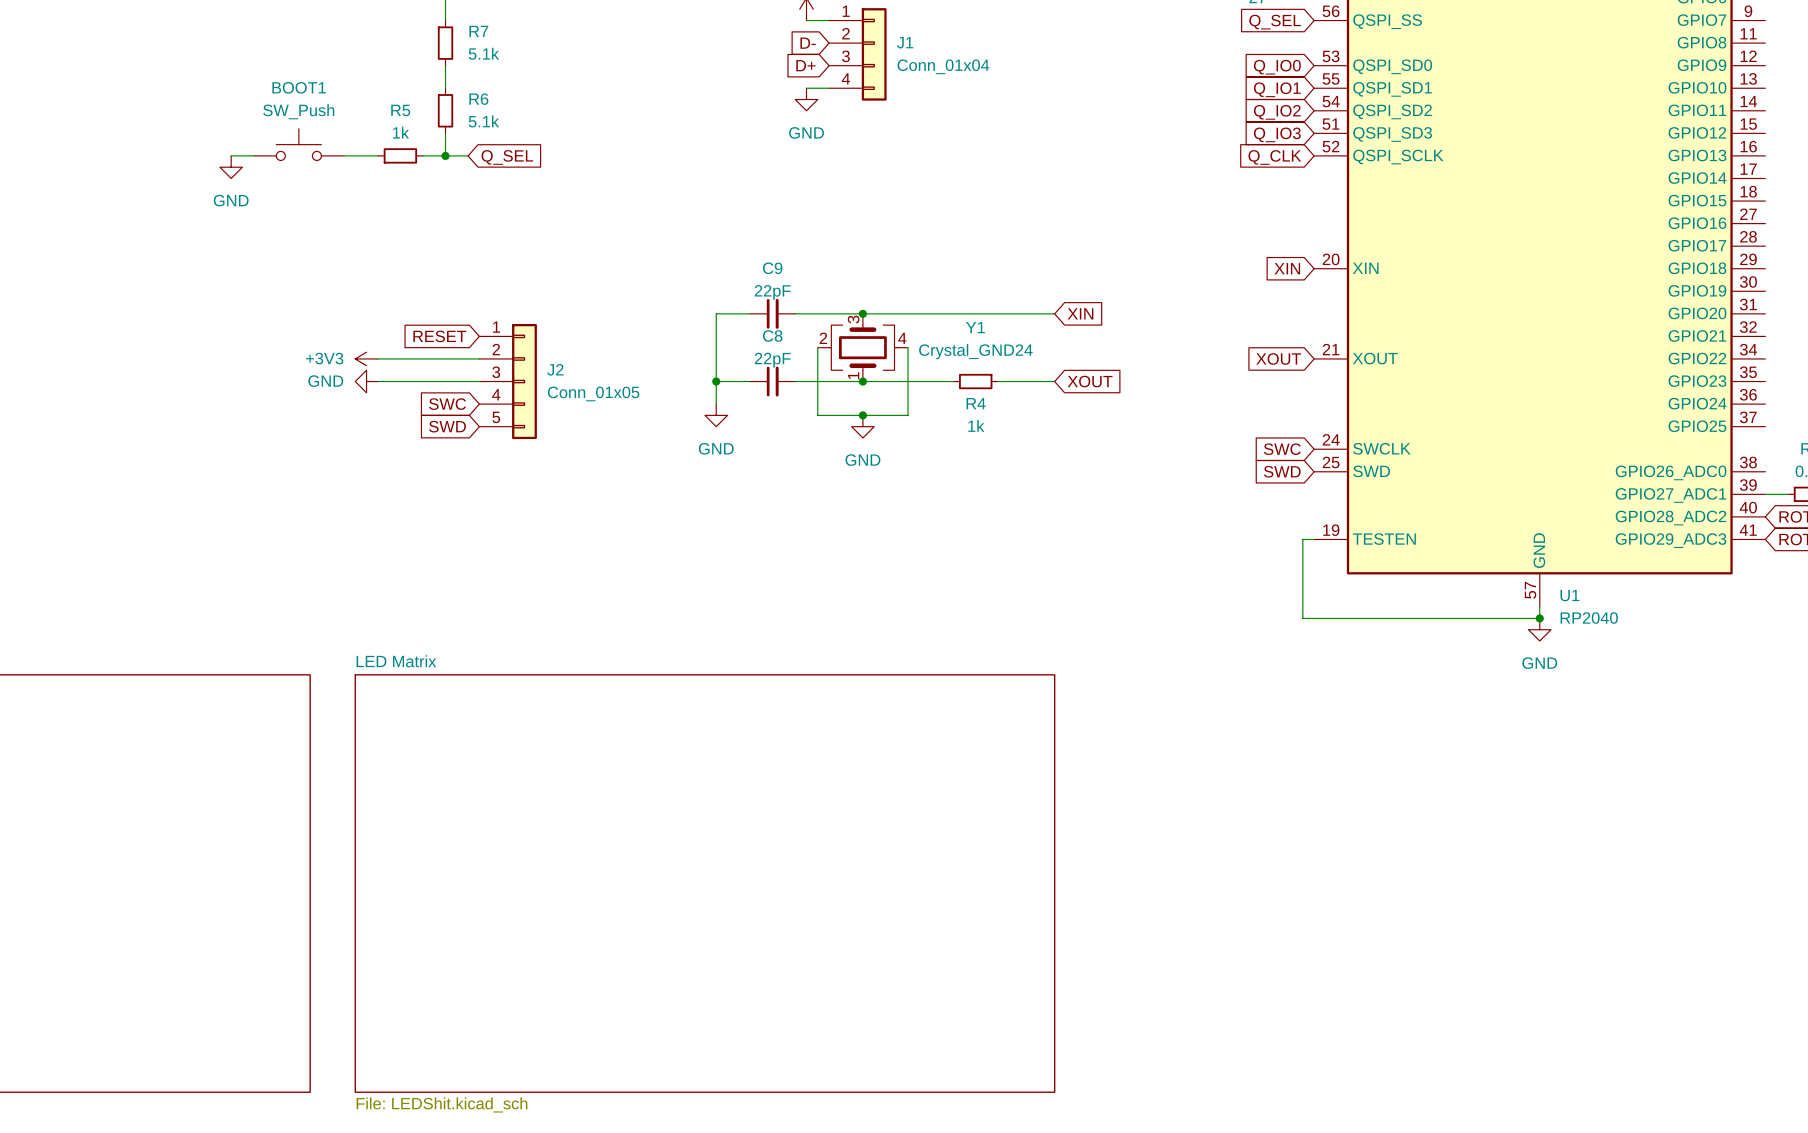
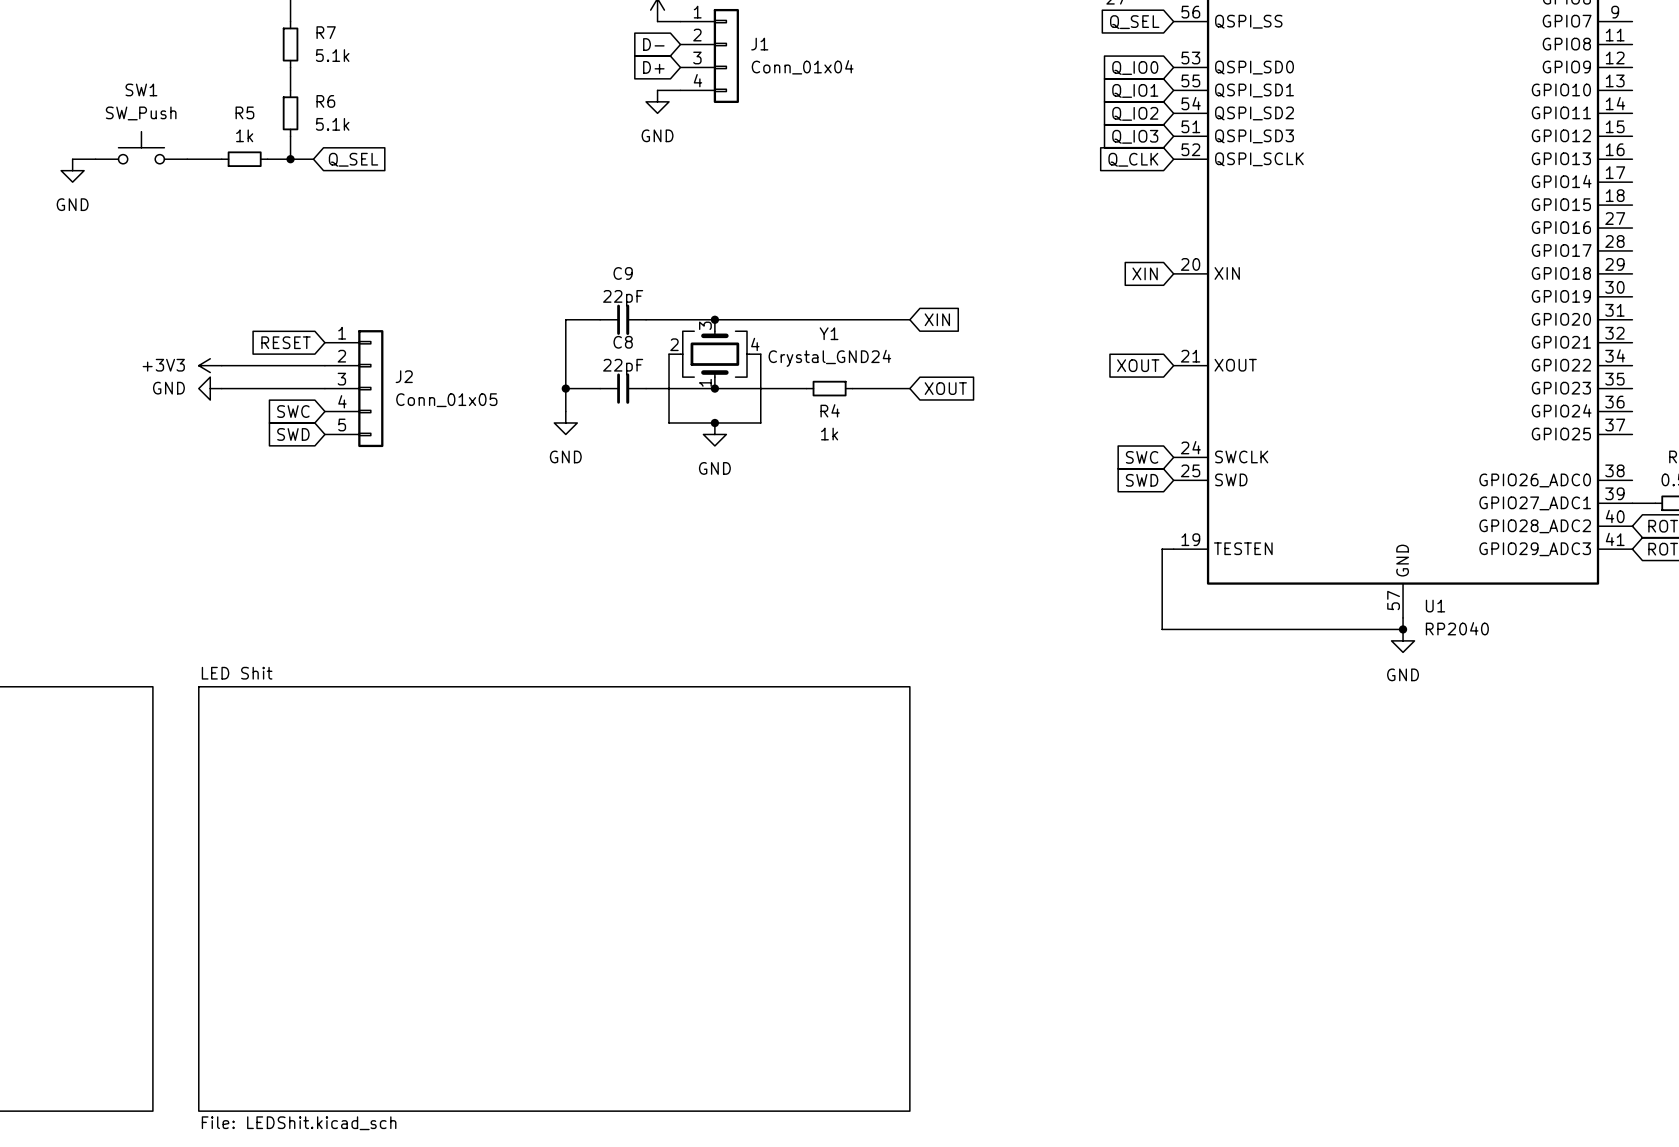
BOOT1 name: BOOT1 (299, 87) -> SW1 (141, 89)
sheet LED Matrix name: LED Matrix (396, 661) -> LED Shit (237, 673)

